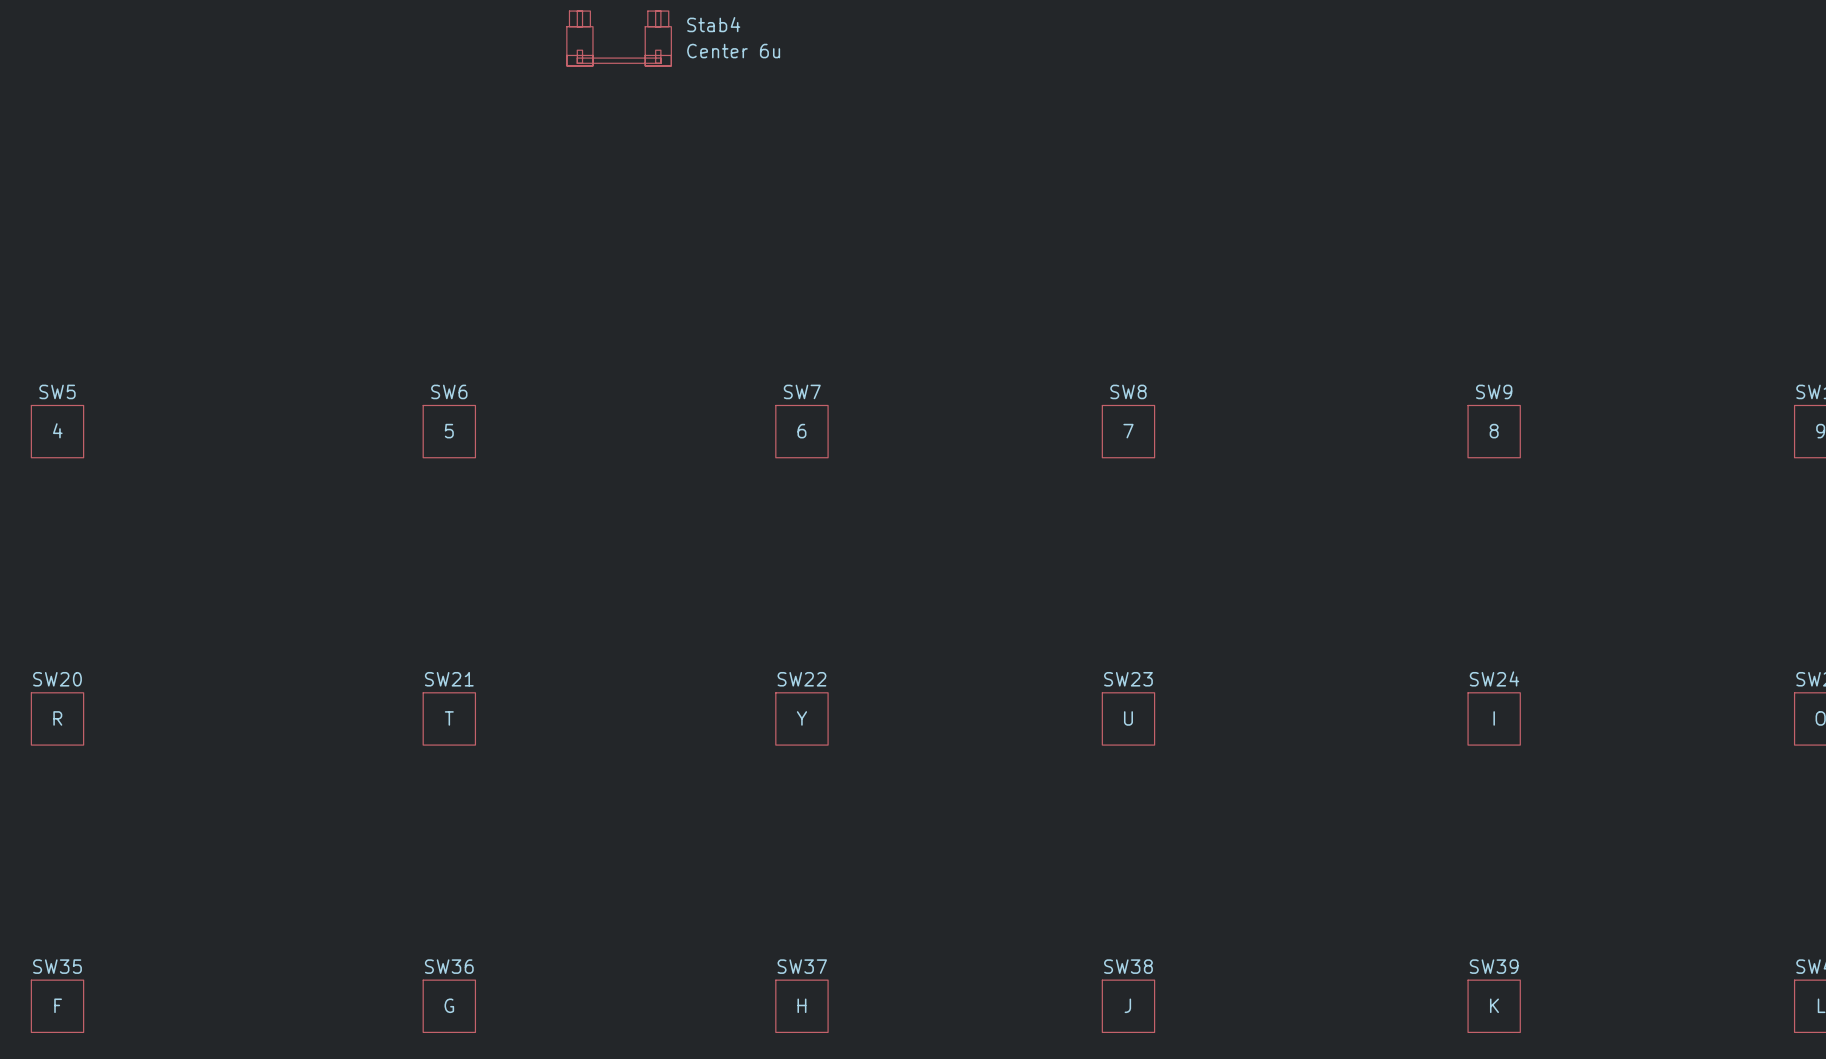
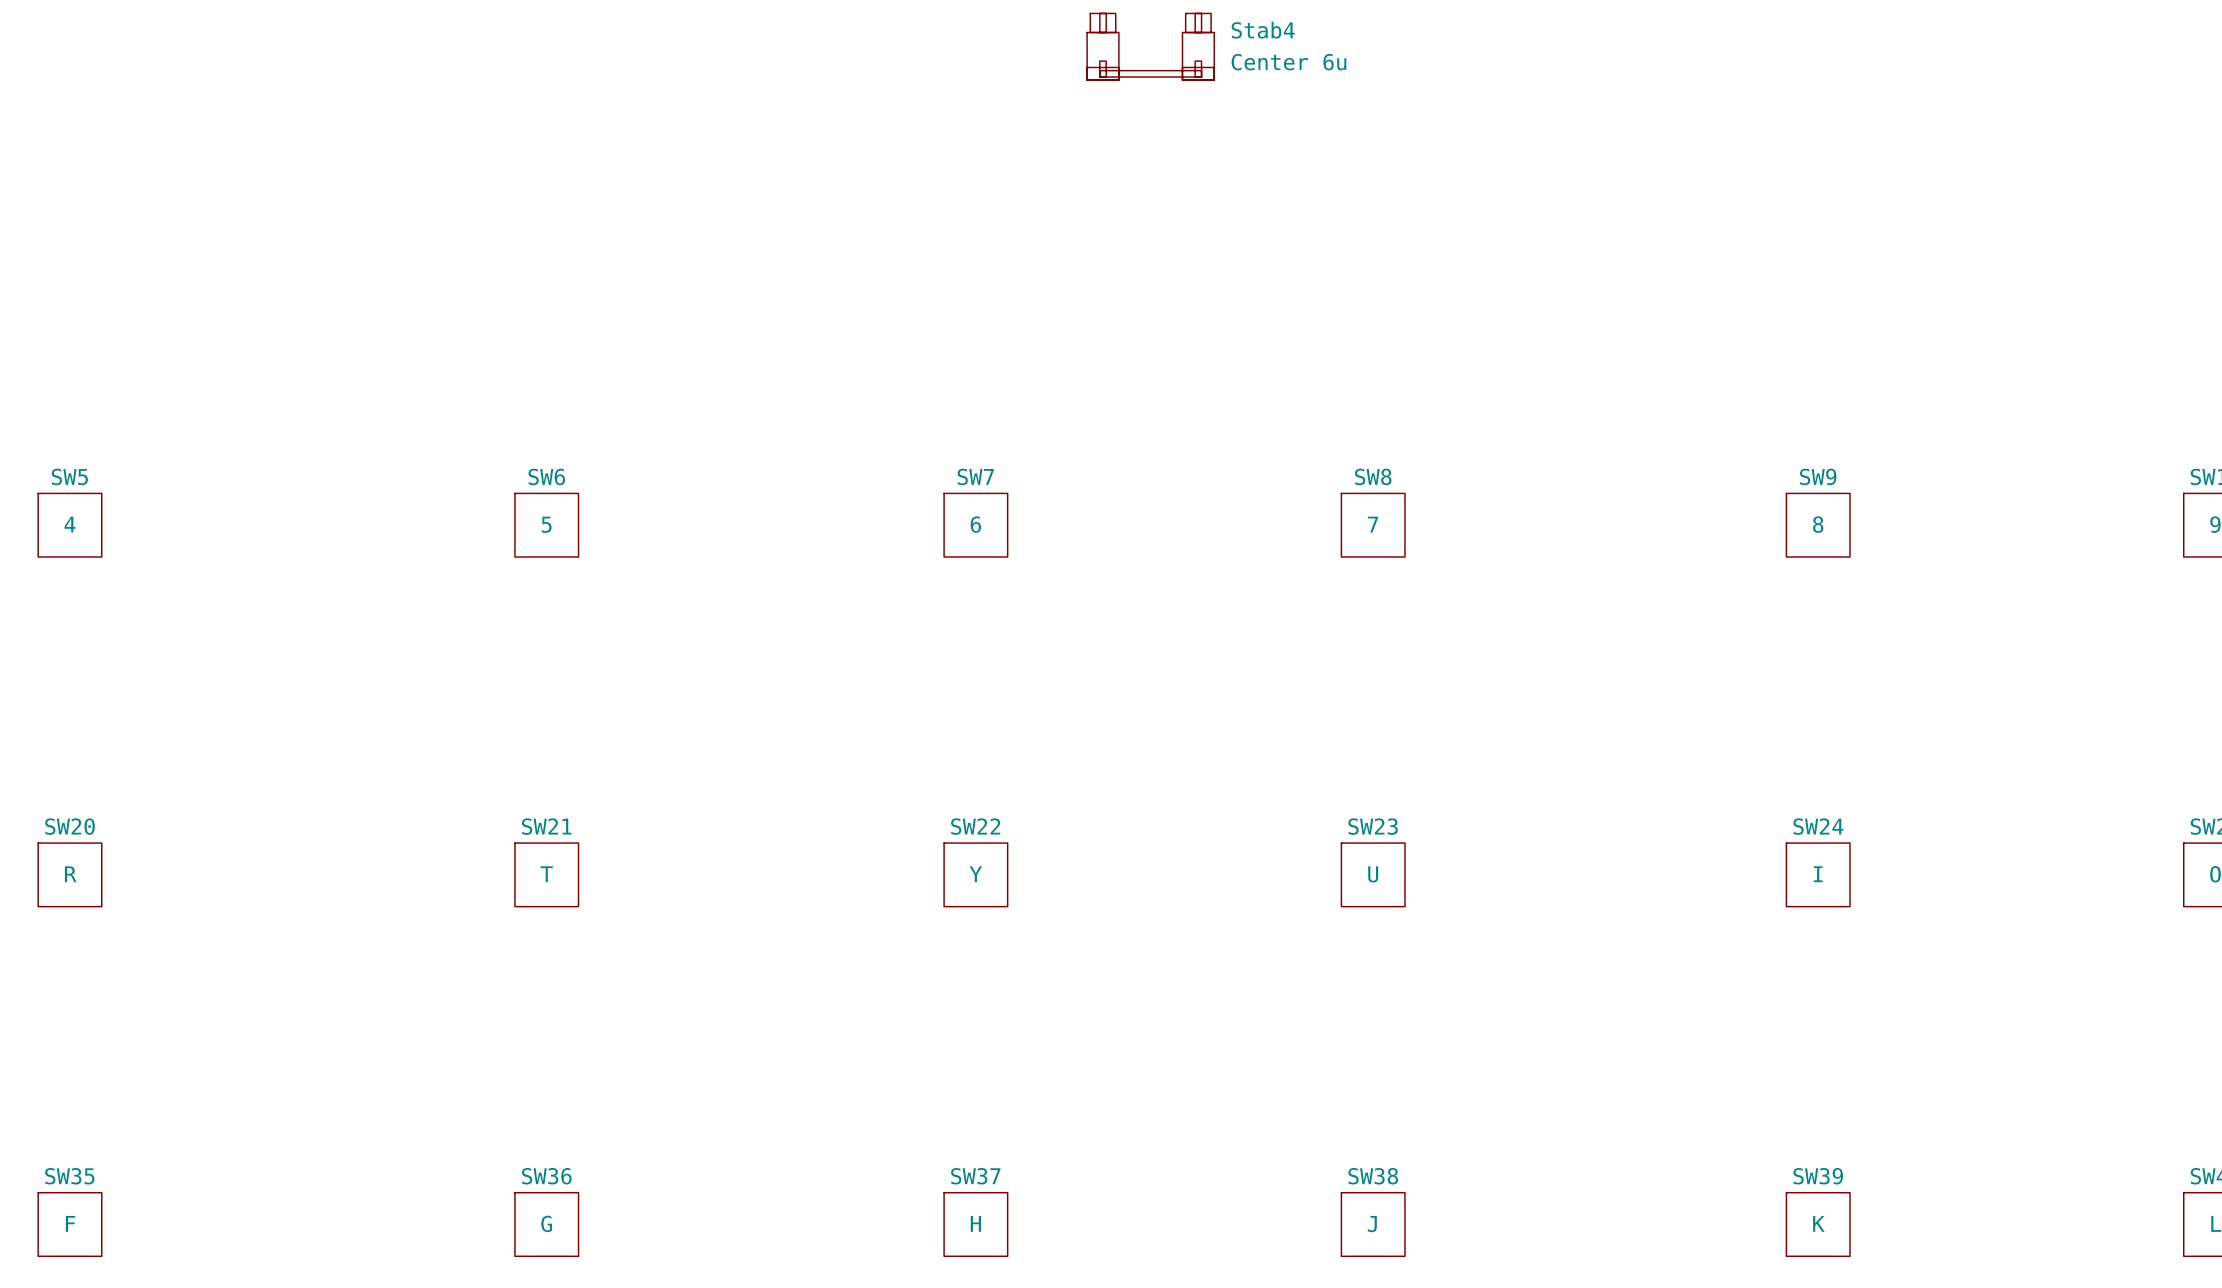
Stab4 position: (619, 38) -> (1150, 46)

